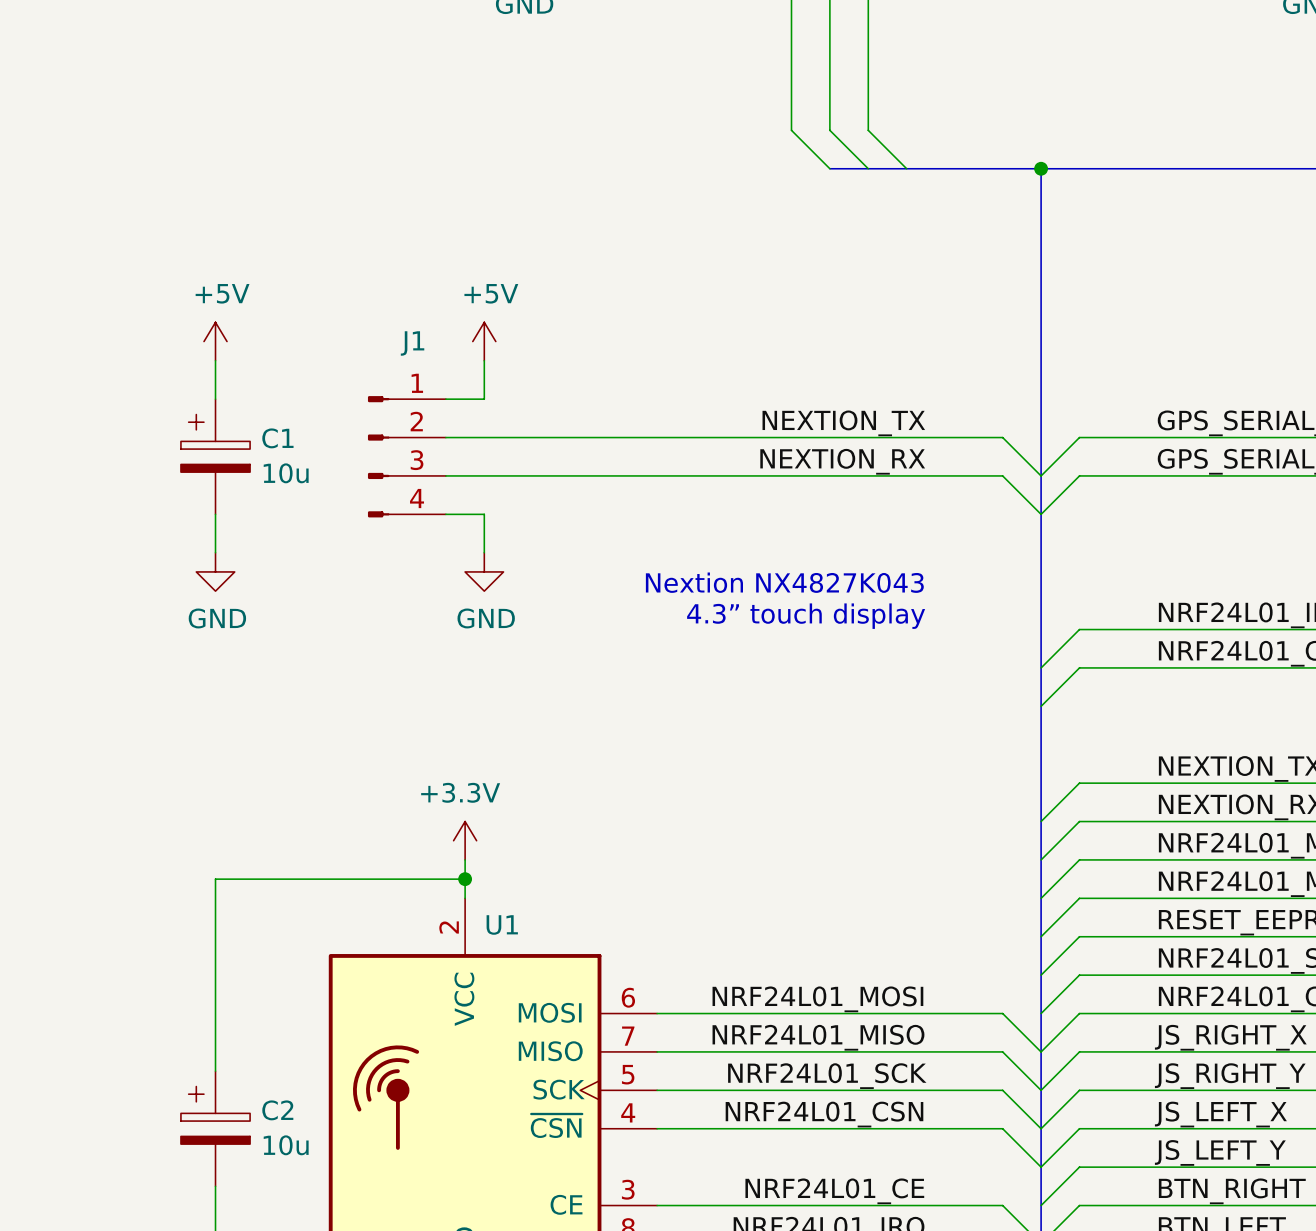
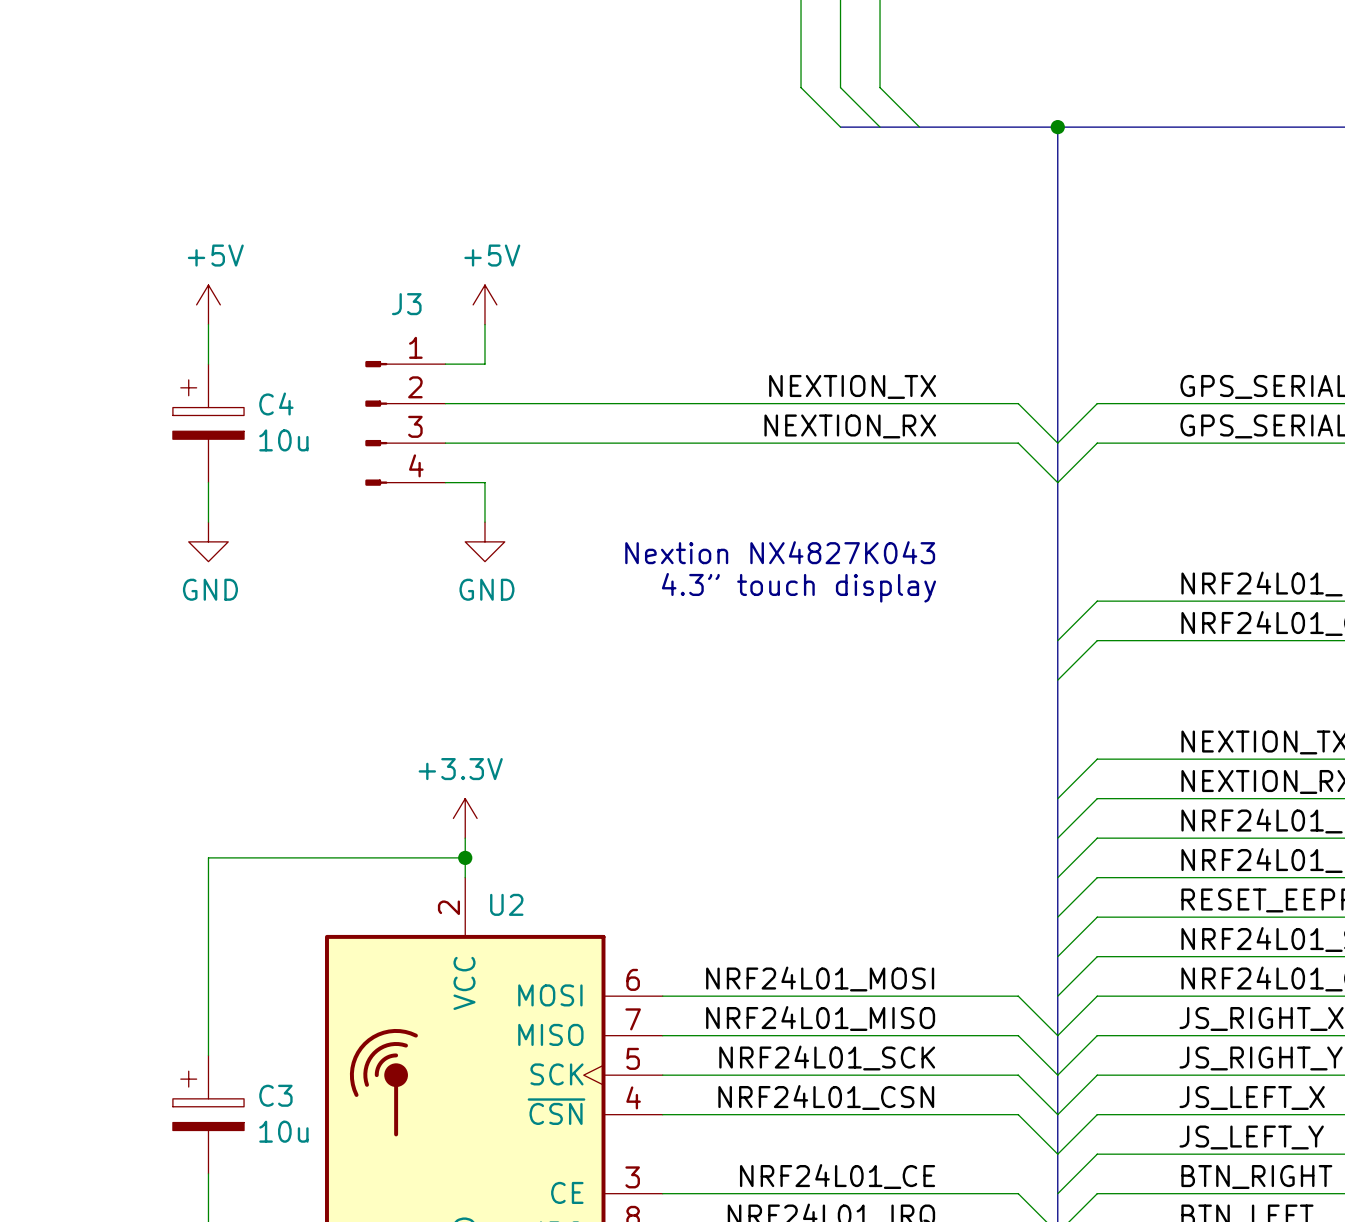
J1 name: J1 (412, 343) -> J3 (406, 304)
C1 name: C1 (277, 438) -> C4 (276, 404)
U1 name: U1 (502, 924) -> U2 (506, 904)
C2 name: C2 (277, 1110) -> C3 (275, 1095)

